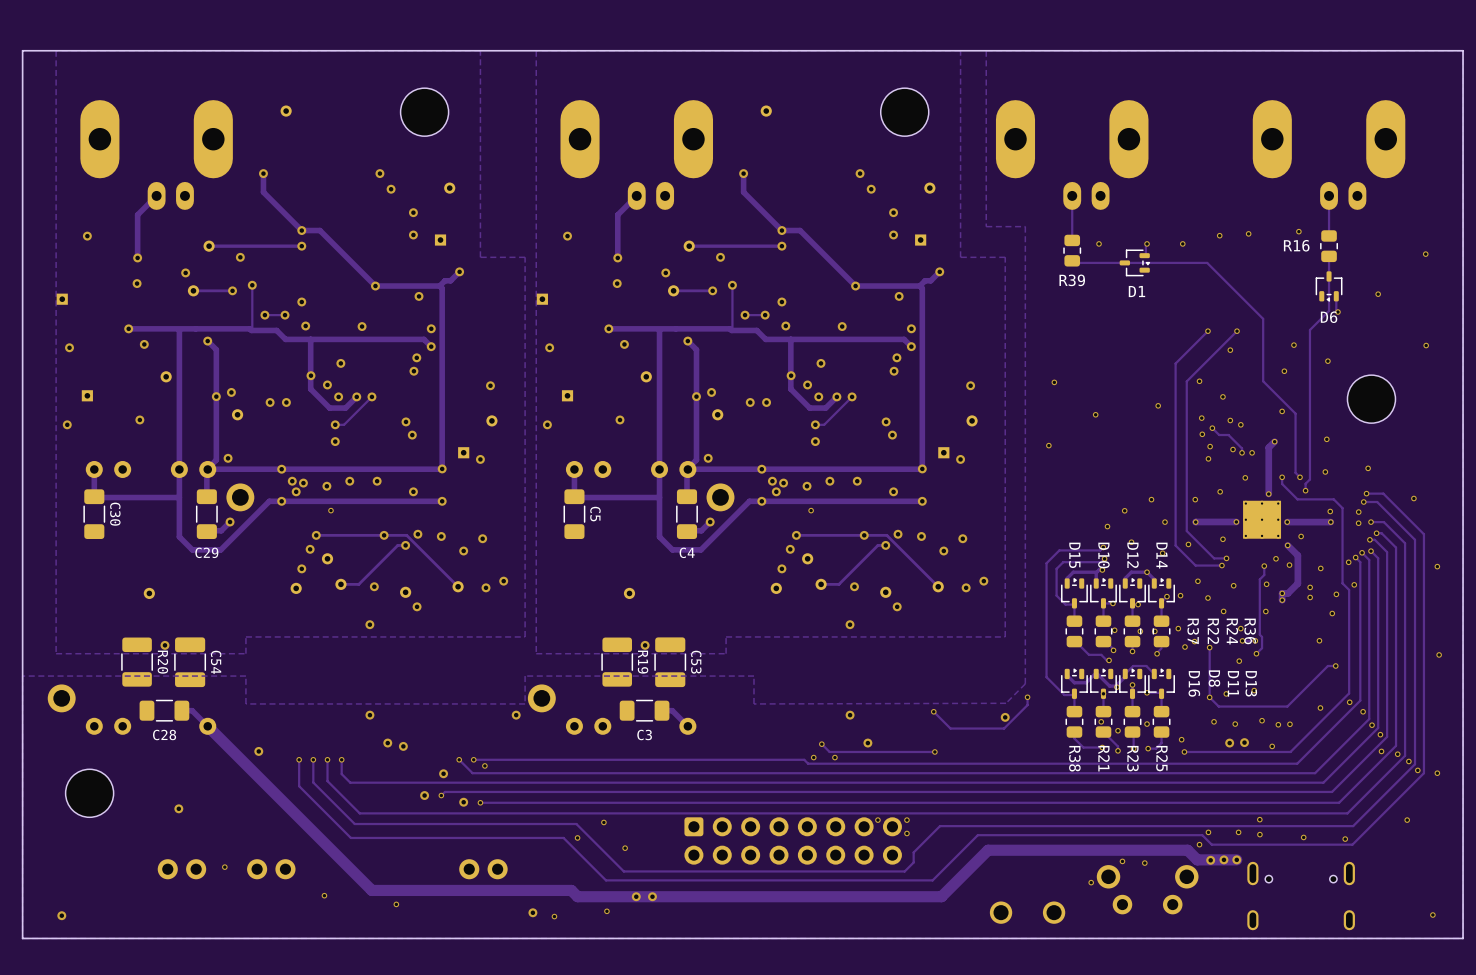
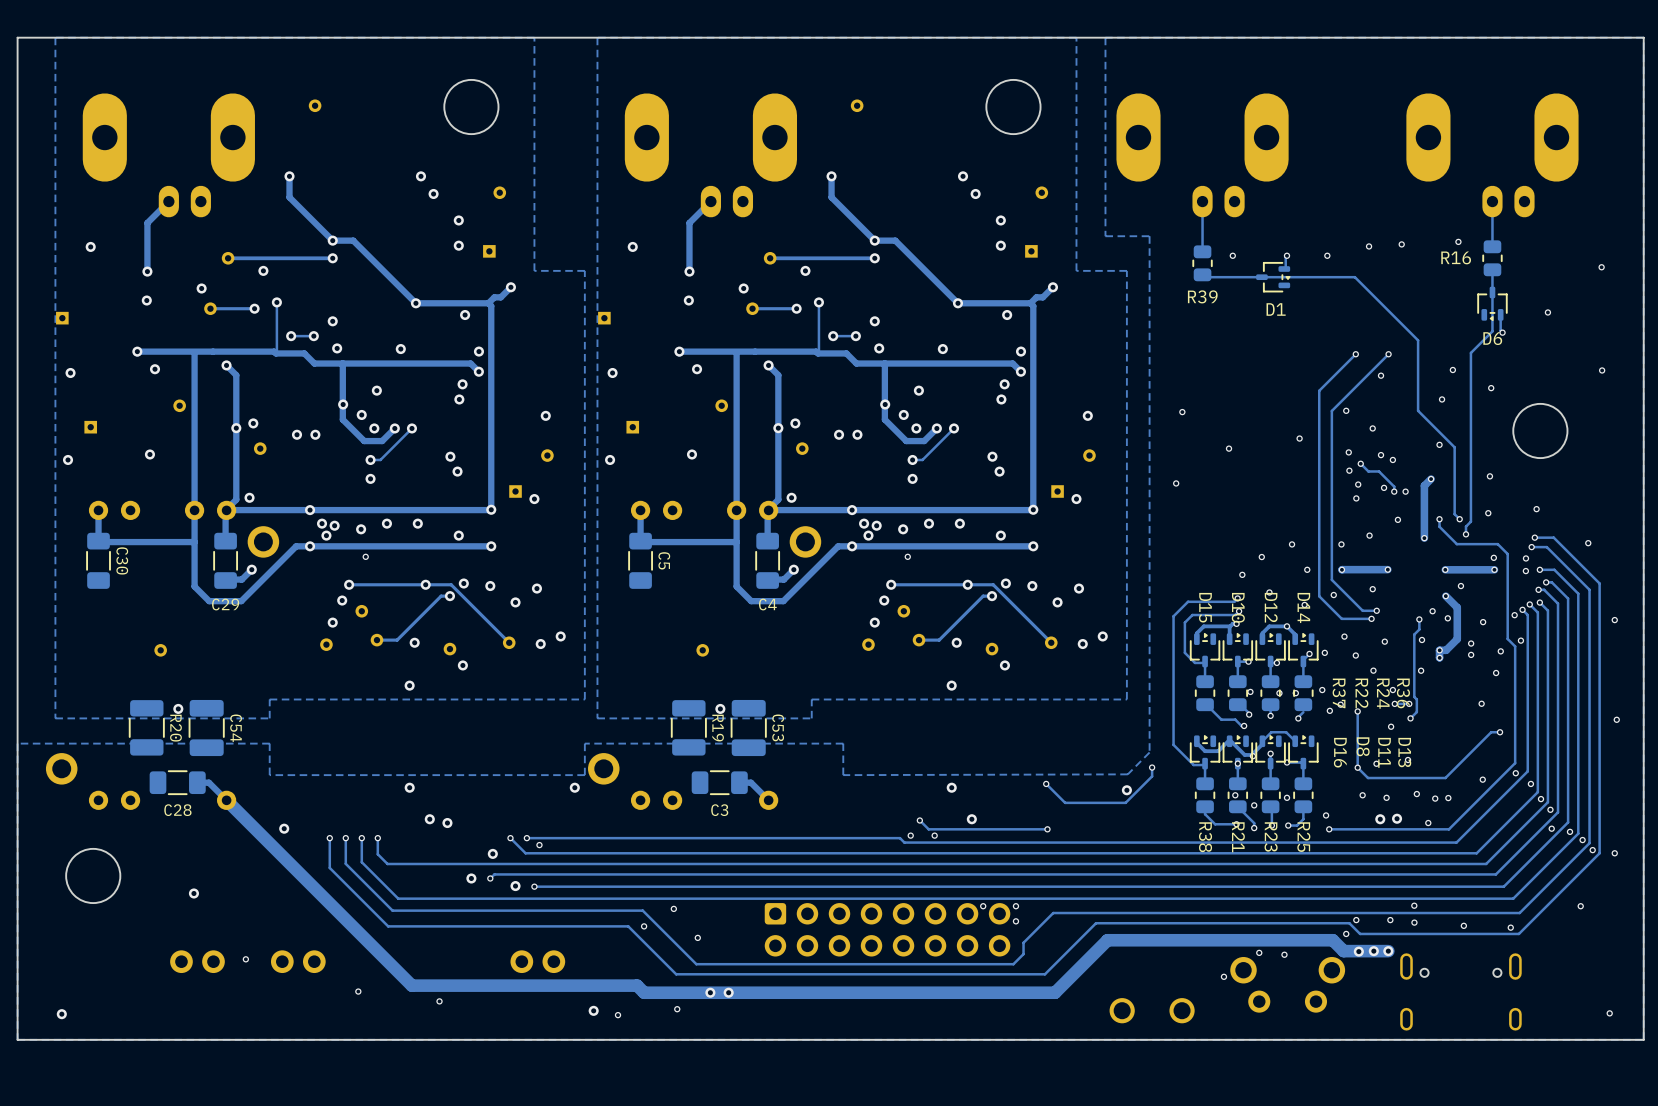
part: (1262, 519) -> none

